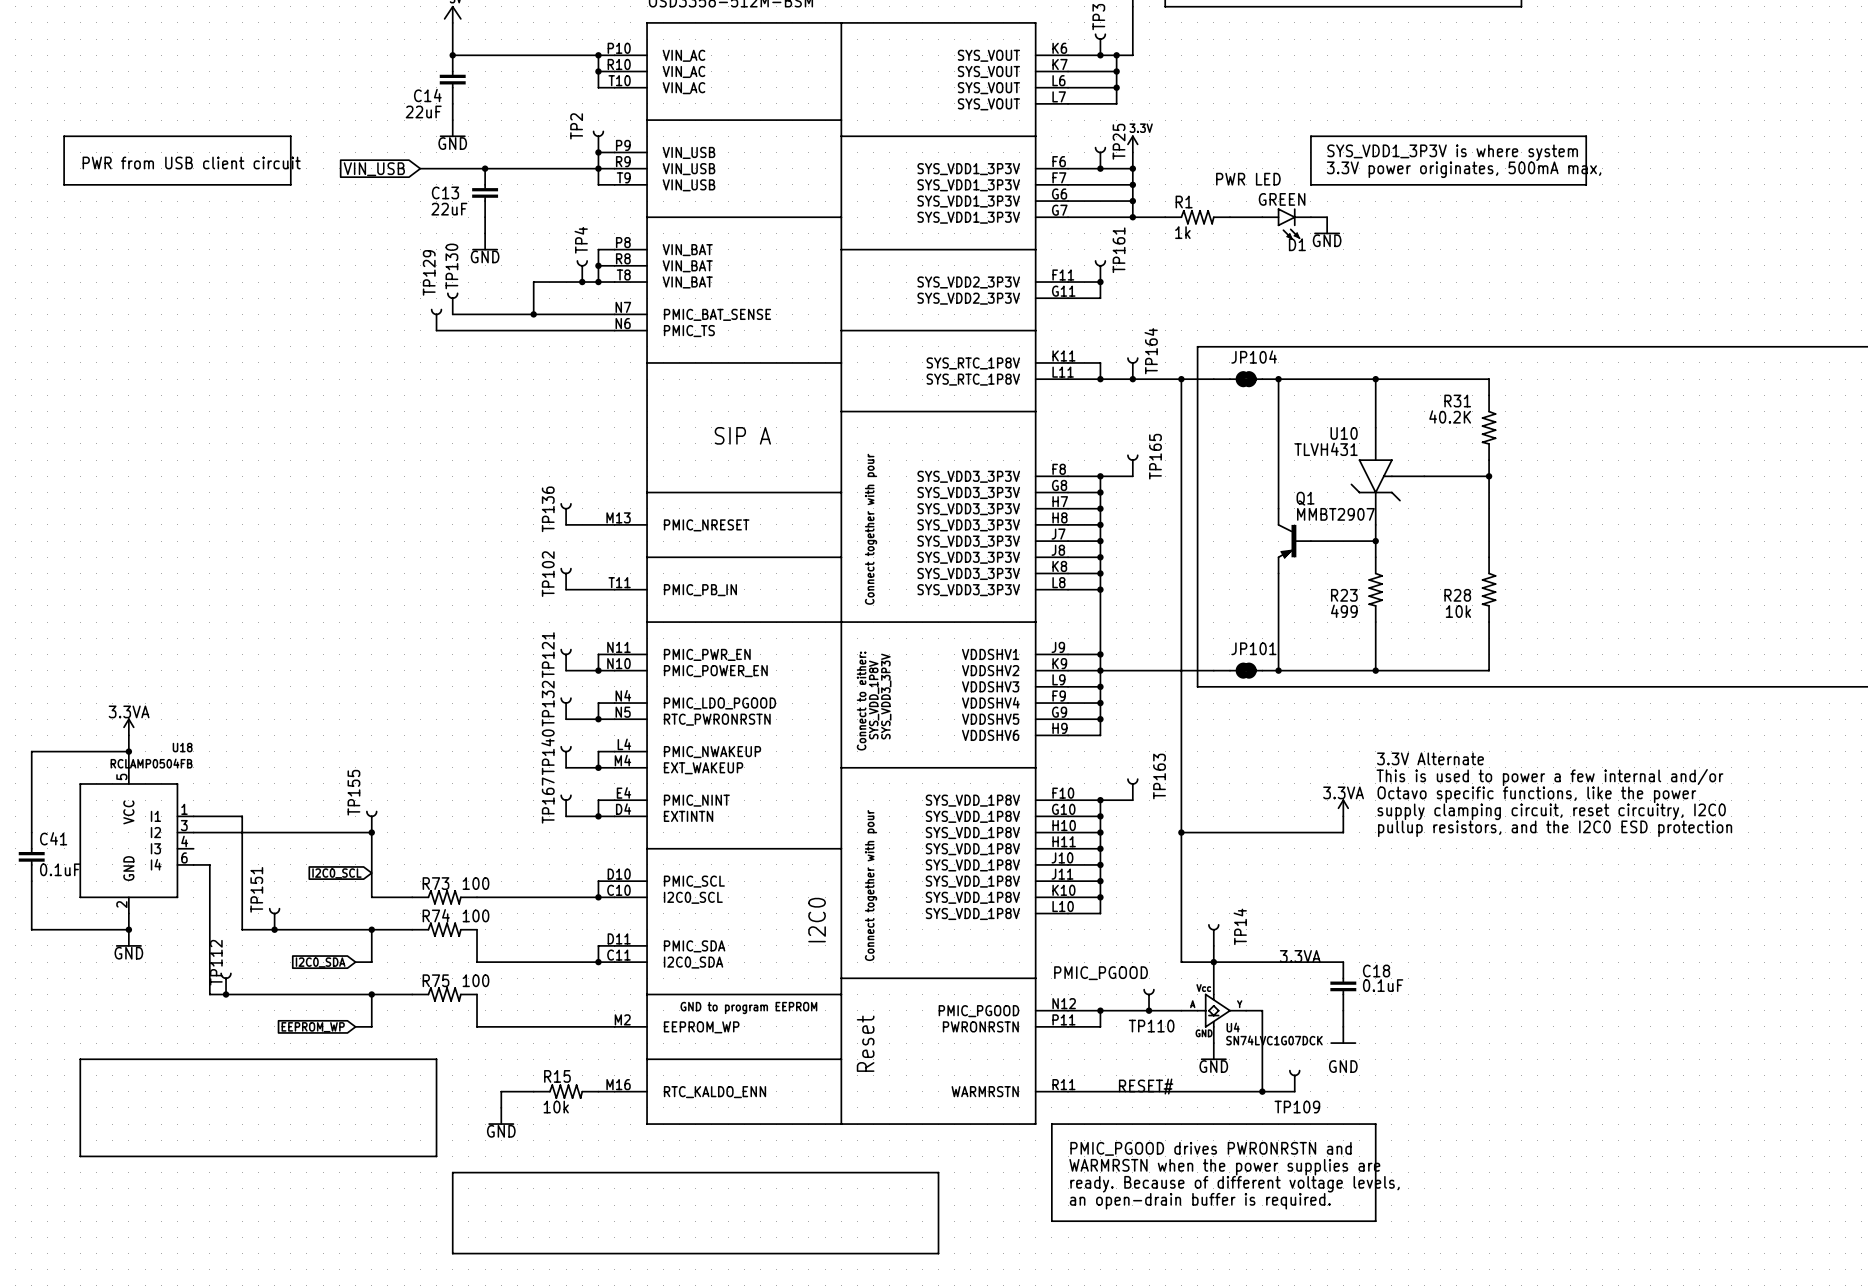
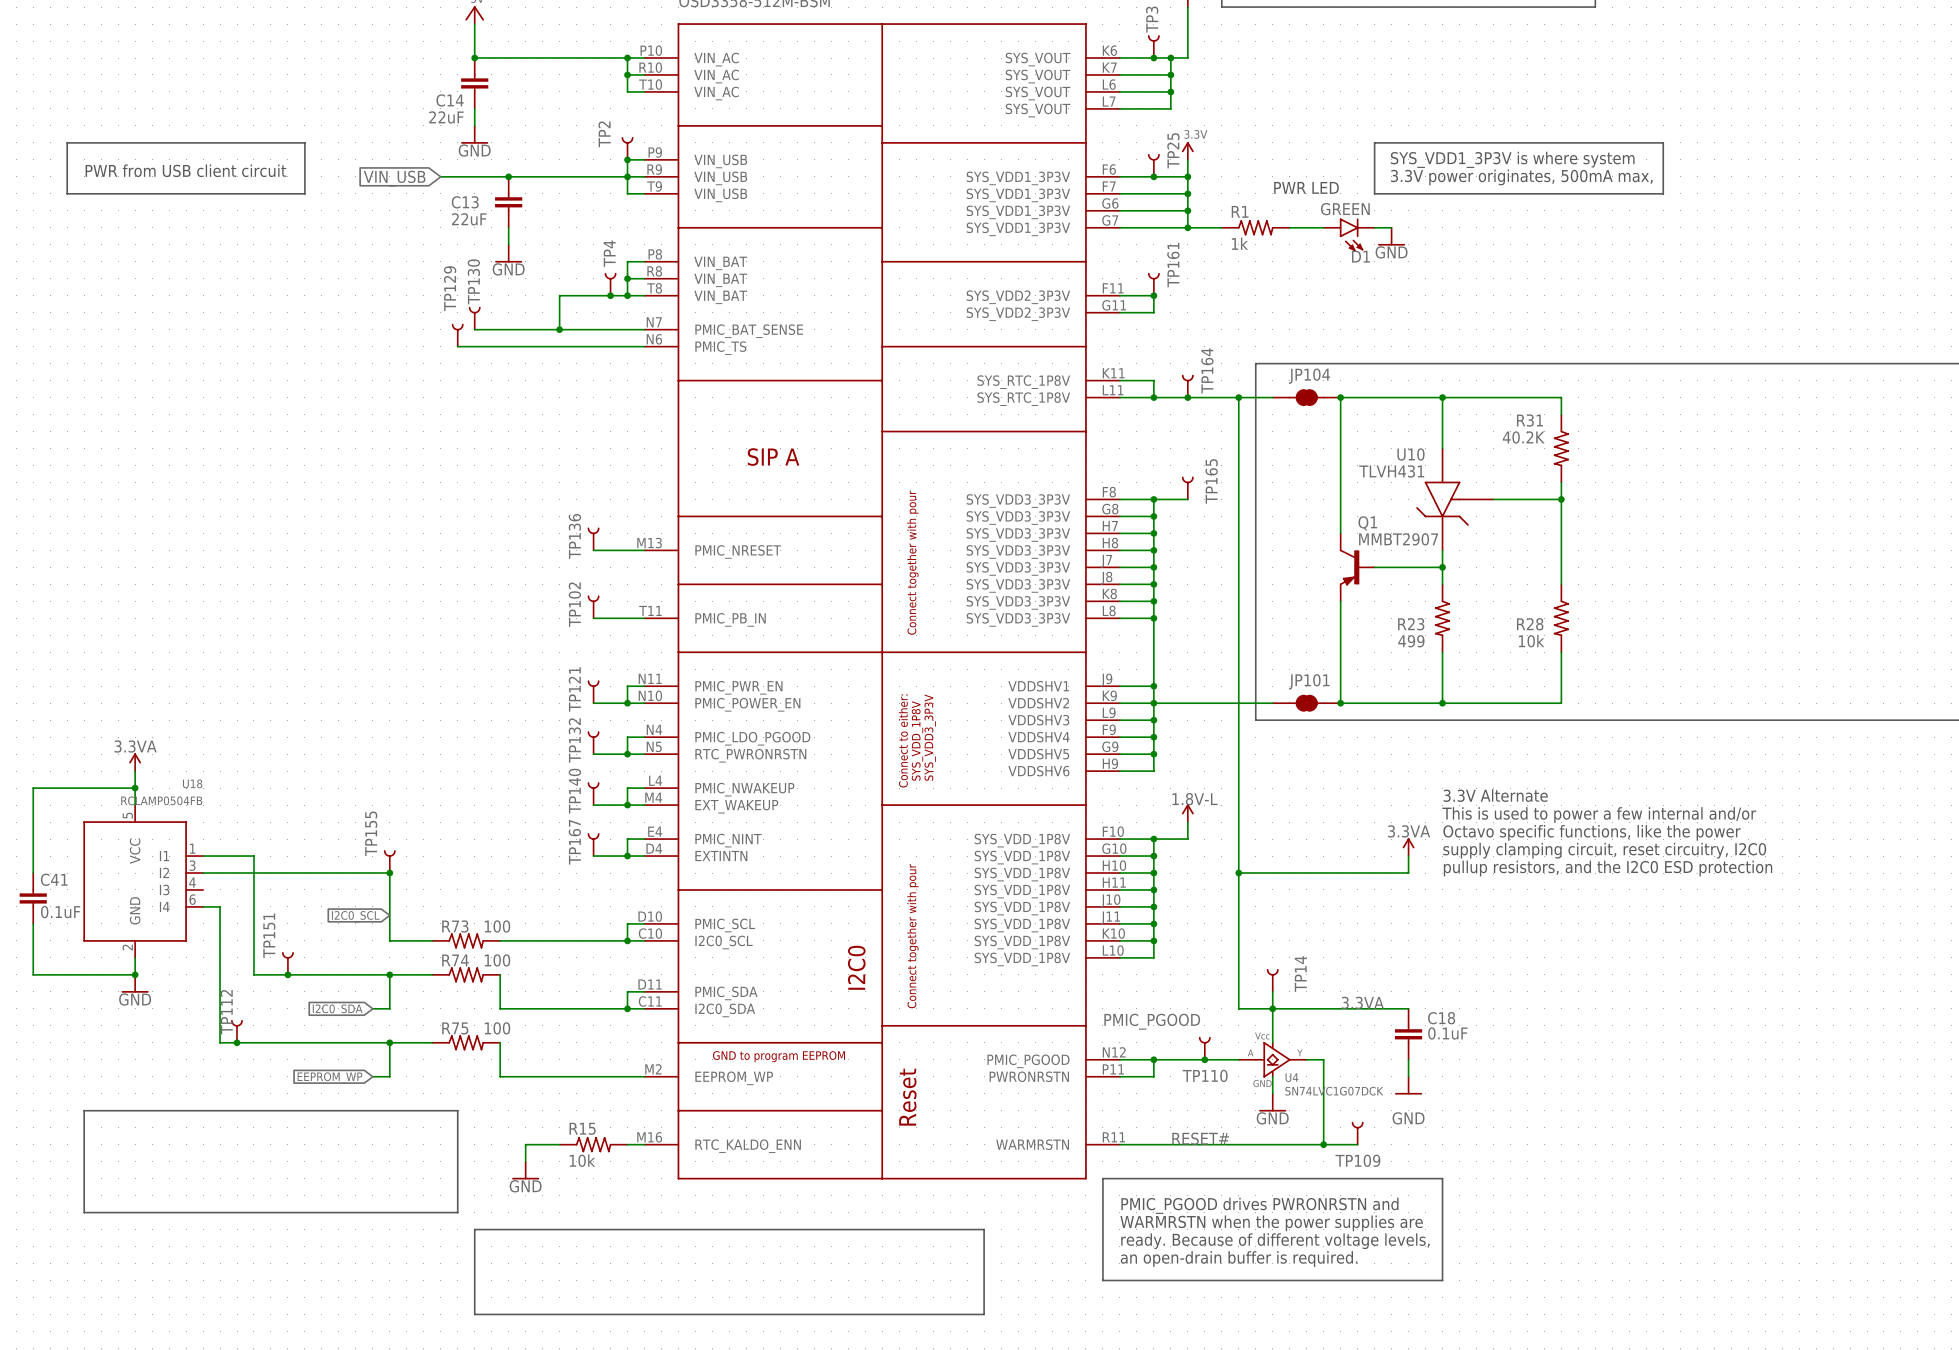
power symbol: none -> 1.8V-L (1187, 813)
TP163: (1132, 789) -> none

